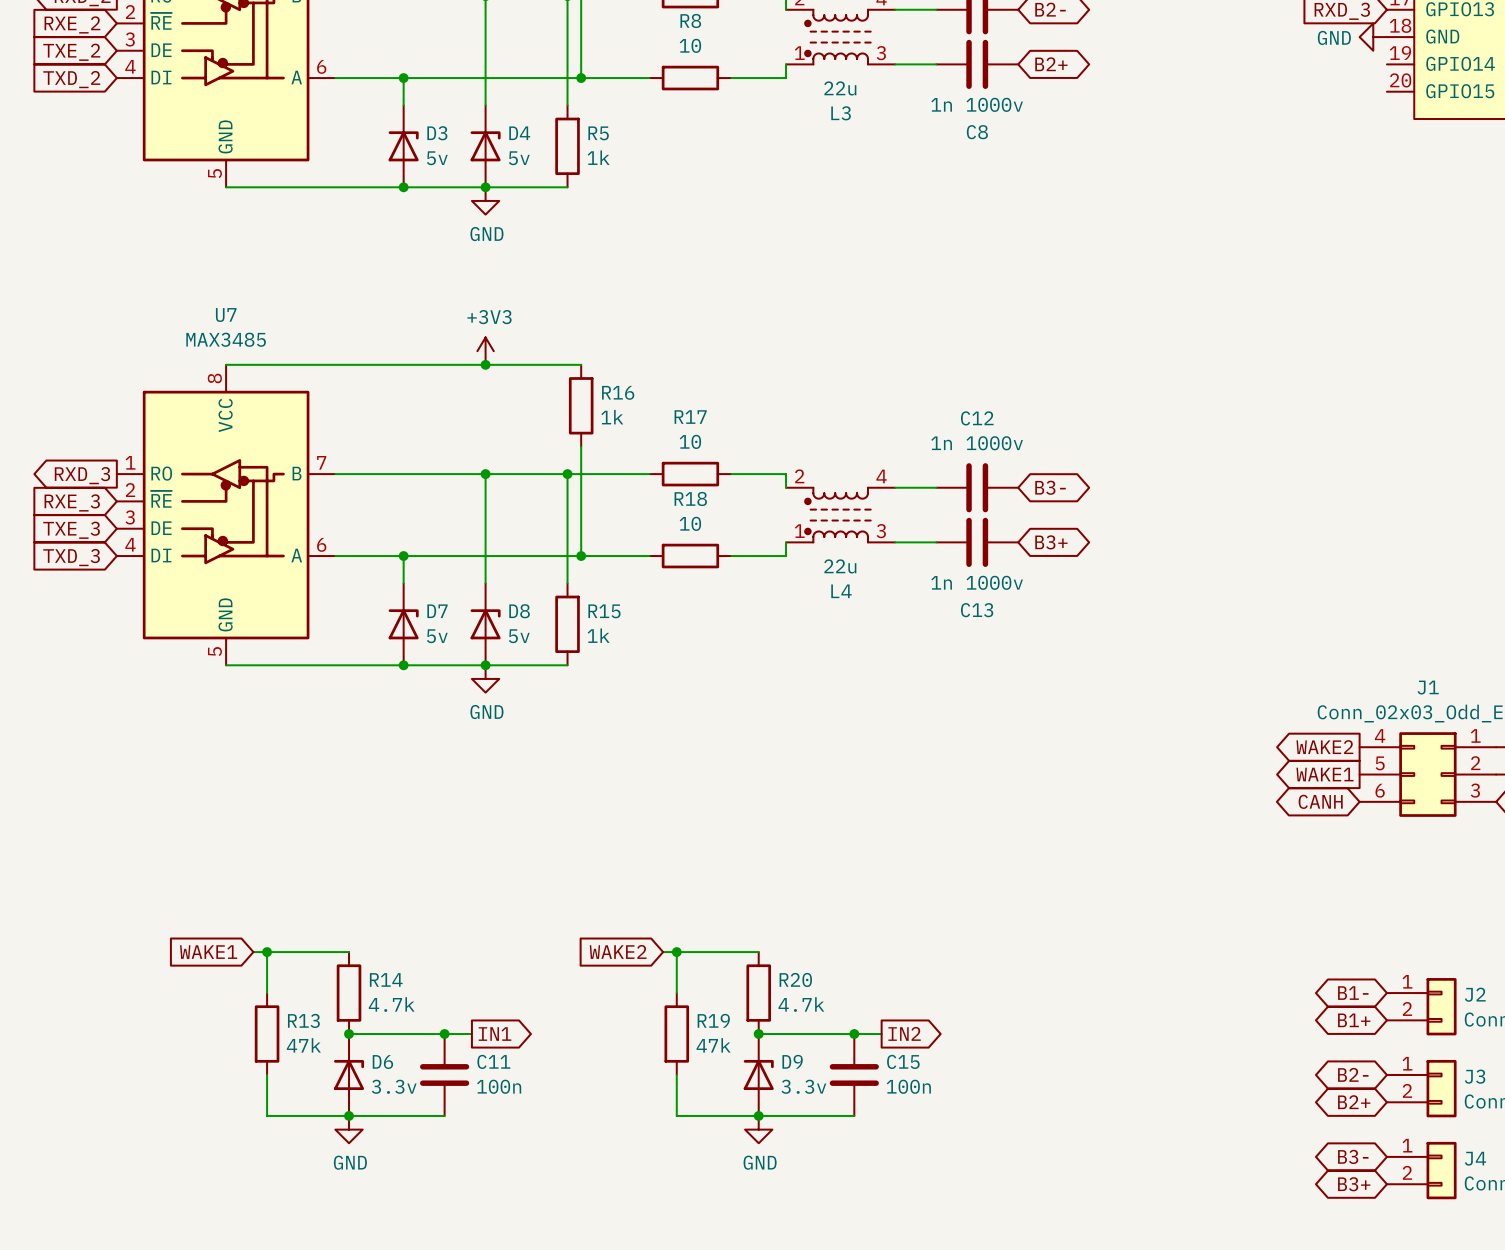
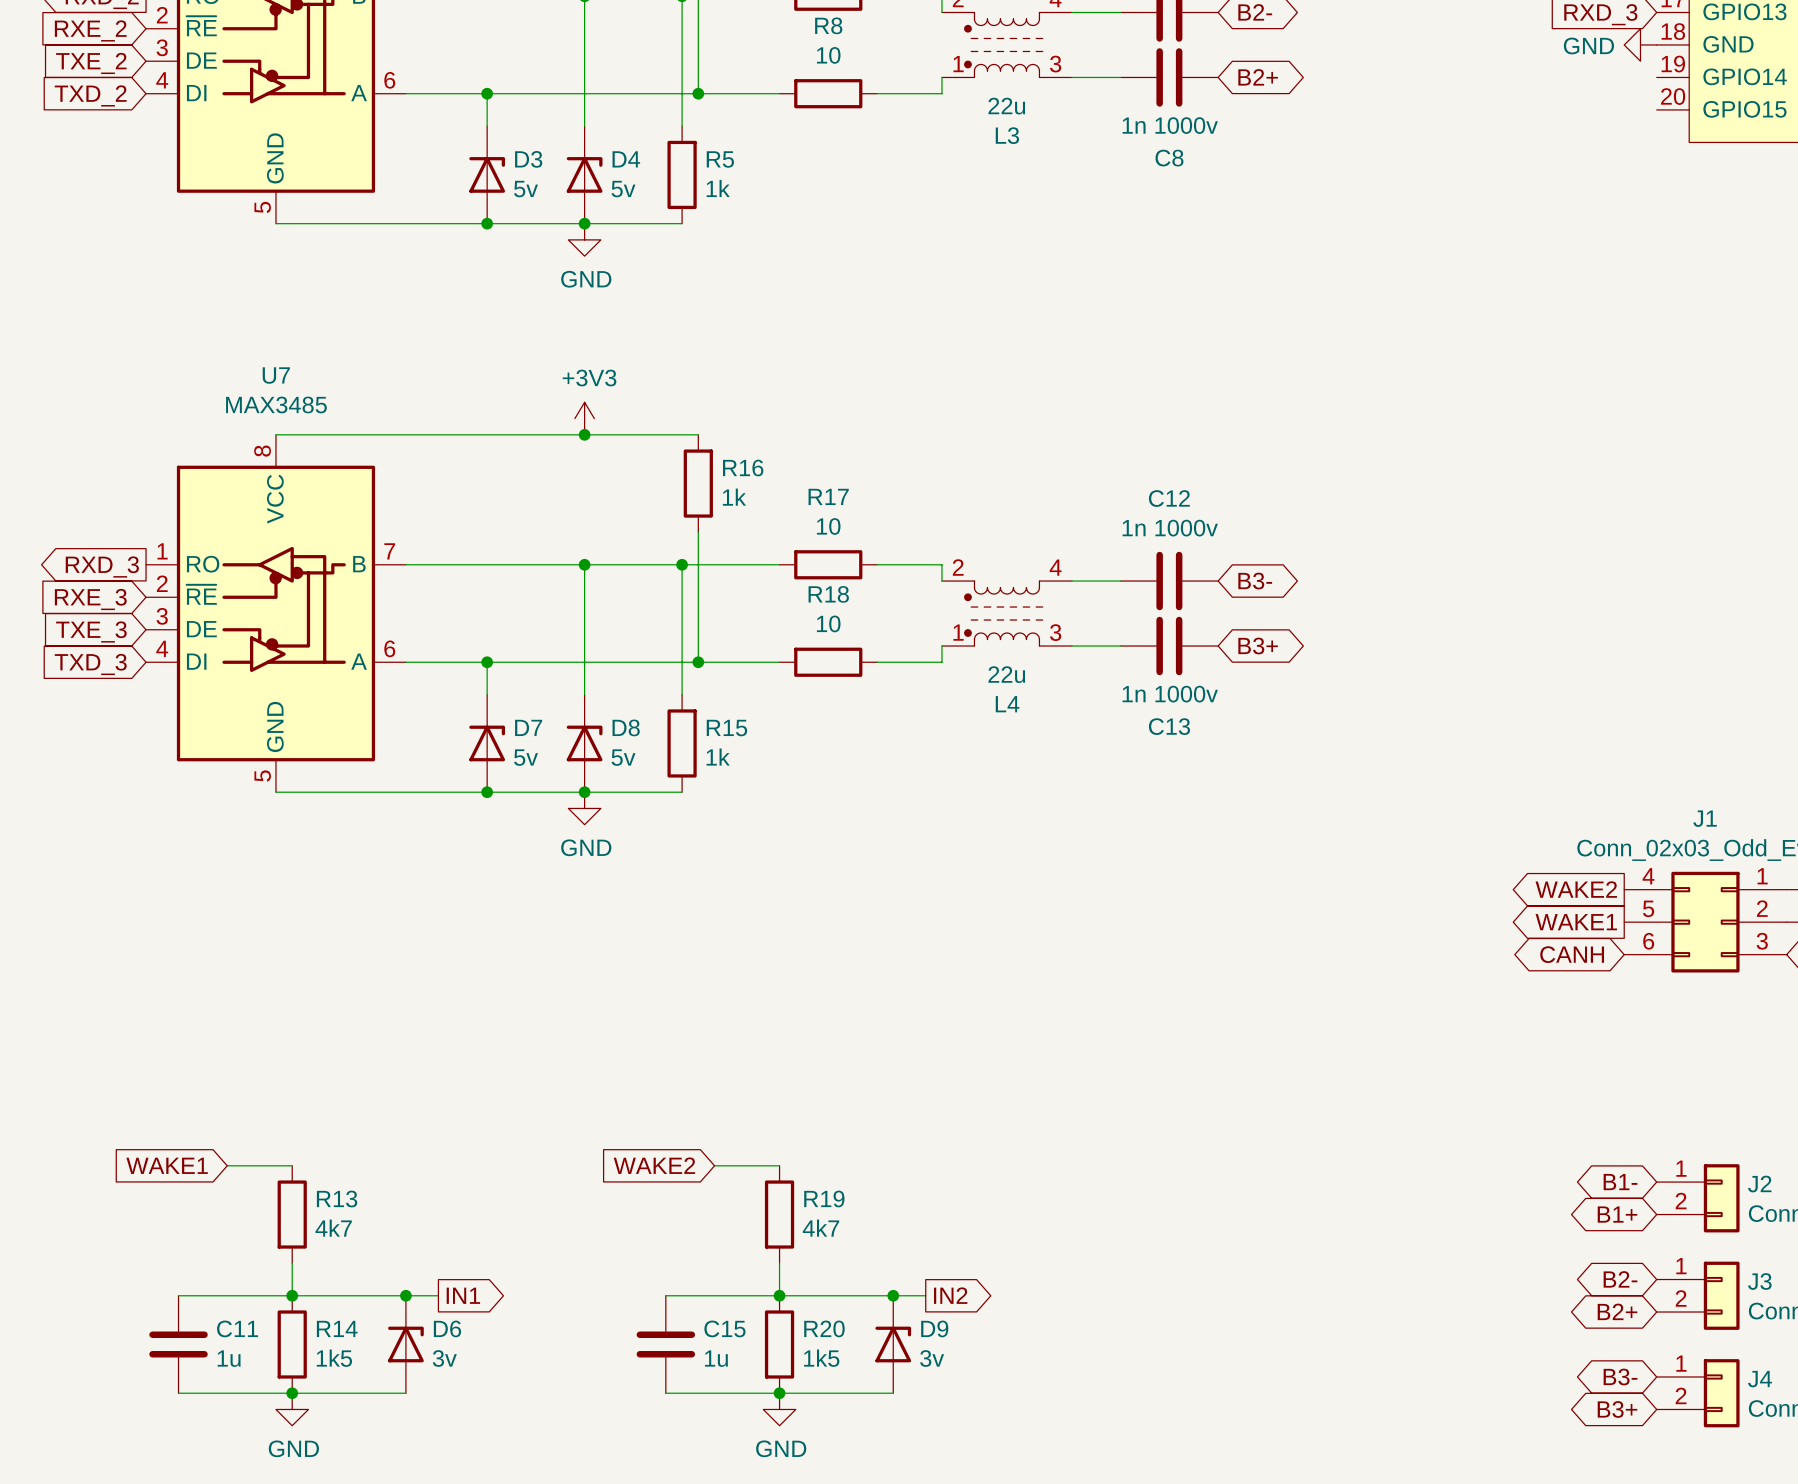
global label position: WAKE2 (618, 951) -> WAKE2 (654, 1165)
global label position: WAKE1 (208, 952) -> WAKE1 (167, 1165)
wire: (253, 952) (349, 952) -> none
wire: (267, 952) (267, 993) -> none
junction: (267, 952) -> none
wire: (663, 952) (758, 952) -> none
wire: (676, 952) (676, 993) -> none
junction: (676, 952) -> none
wire: none -> (227, 1165) (292, 1165)
wire: none -> (714, 1165) (779, 1165)
R14 position: (349, 993) -> (292, 1344)
R20 position: (758, 993) -> (779, 1344)
R14 value: 4.7k (391, 1004) -> 1k5 (334, 1358)
R20 value: 4.7k (801, 1004) -> 1k5 (821, 1358)
global label position: IN2 (904, 1033) -> IN2 (950, 1295)
R13 position: (267, 1034) -> (292, 1214)
wire: (349, 1034) (471, 1034) -> none
junction: (349, 1034) -> none
junction: (444, 1034) -> none
global label position: IN1 (495, 1034) -> IN1 (463, 1295)
R19 position: (676, 1034) -> (779, 1214)
wire: (758, 1034) (881, 1034) -> none
junction: (758, 1034) -> none
junction: (854, 1034) -> none
R13 value: 47k (303, 1045) -> 4k7 (333, 1228)
R19 value: 47k (713, 1045) -> 4k7 (820, 1228)
wire: none -> (292, 1263) (292, 1295)
wire: none -> (779, 1263) (779, 1295)
wire: (267, 1074) (267, 1115) (444, 1115) -> none
D6 position: (349, 1074) -> (405, 1344)
C11 position: (444, 1074) -> (178, 1344)
wire: (676, 1074) (676, 1115) (854, 1115) -> none
D9 position: (758, 1074) -> (893, 1344)
C15 position: (854, 1074) -> (665, 1344)
D6 value: 3.3v (394, 1086) -> 3v (444, 1358)
C11 value: 100n (499, 1086) -> 1u (229, 1358)
D9 value: 3.3v (803, 1086) -> 3v (932, 1358)
C15 value: 100n (908, 1086) -> 1u (716, 1358)
wire: none -> (178, 1295) (438, 1295)
junction: none -> (292, 1295)
junction: none -> (405, 1295)
wire: none -> (665, 1295) (925, 1295)
junction: none -> (779, 1295)
junction: none -> (893, 1295)
junction: (349, 1115) -> none
junction: (758, 1115) -> none
power symbol position: GND (349, 1129) -> GND (292, 1409)
power symbol position: GND (758, 1129) -> GND (779, 1409)
wire: none -> (178, 1393) (405, 1393)
junction: none -> (292, 1393)
wire: none -> (665, 1393) (893, 1393)
junction: none -> (779, 1393)

